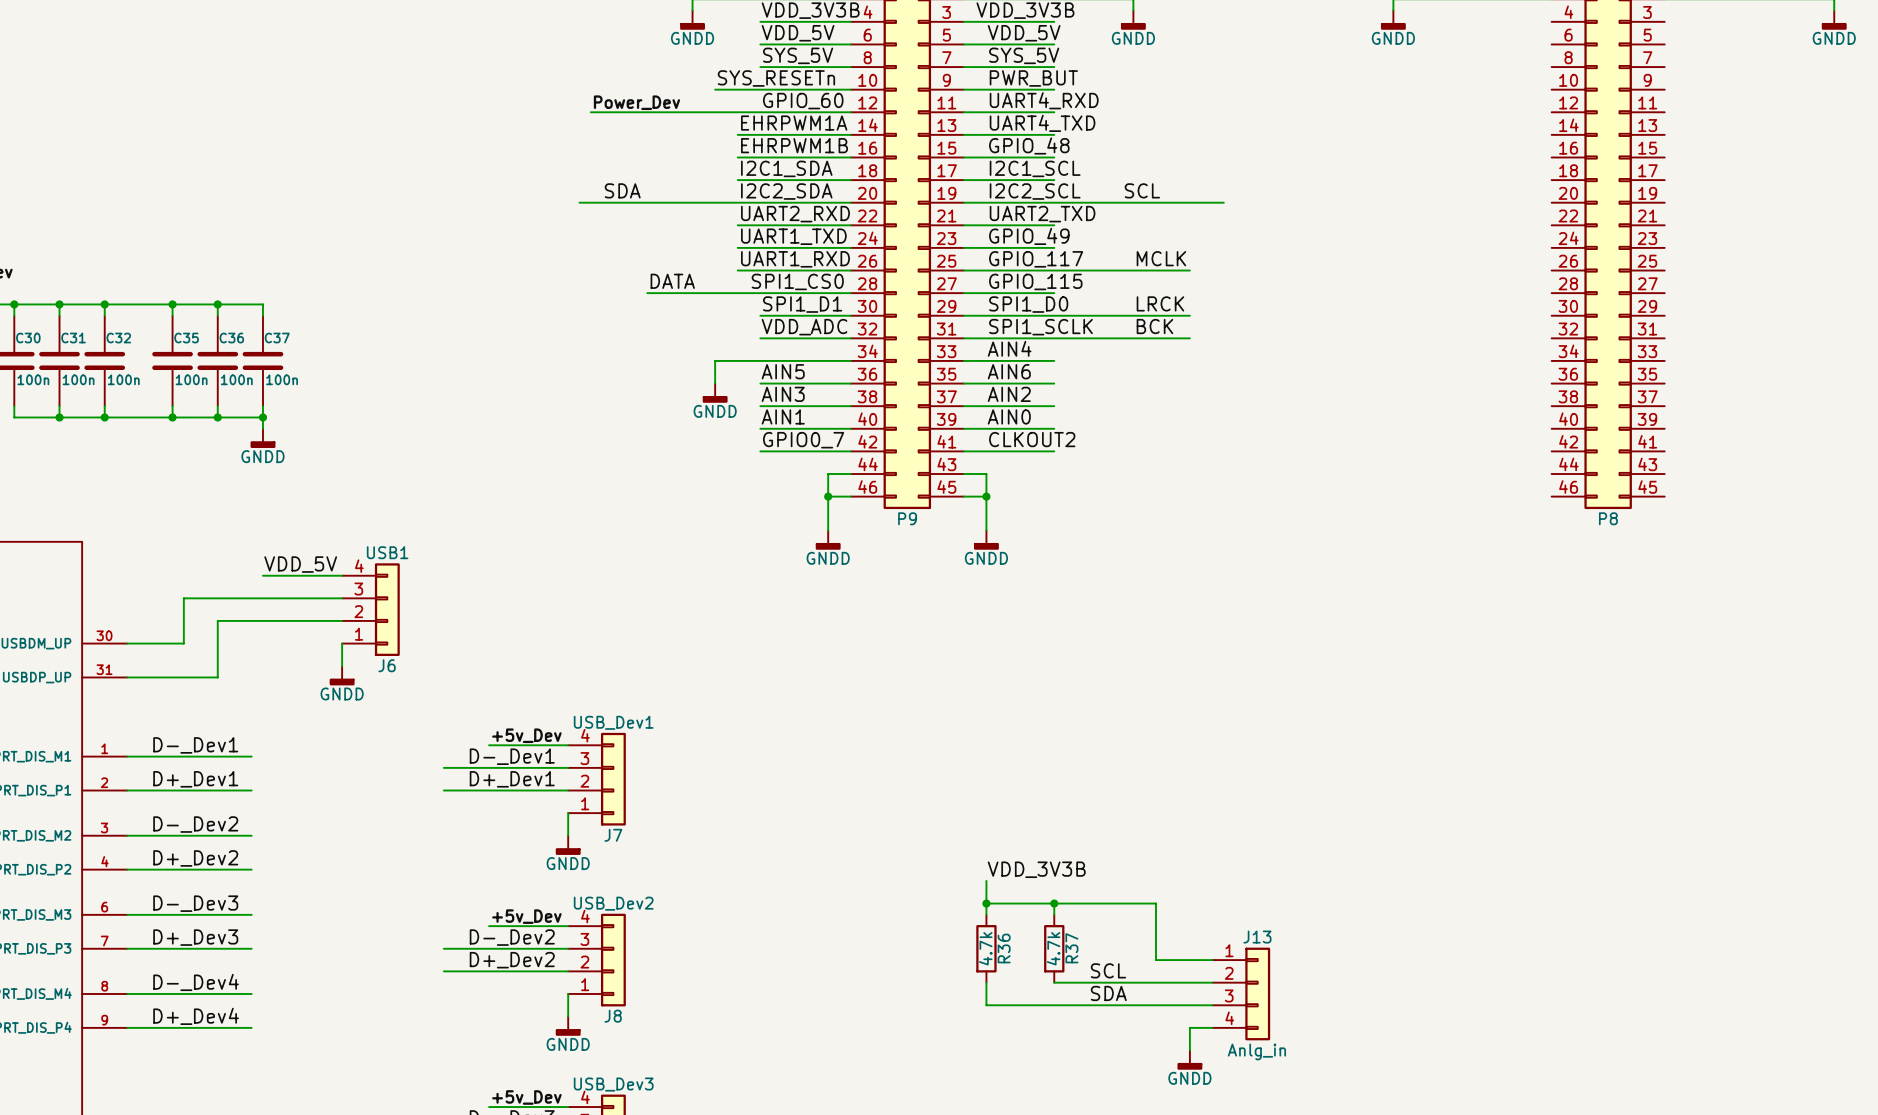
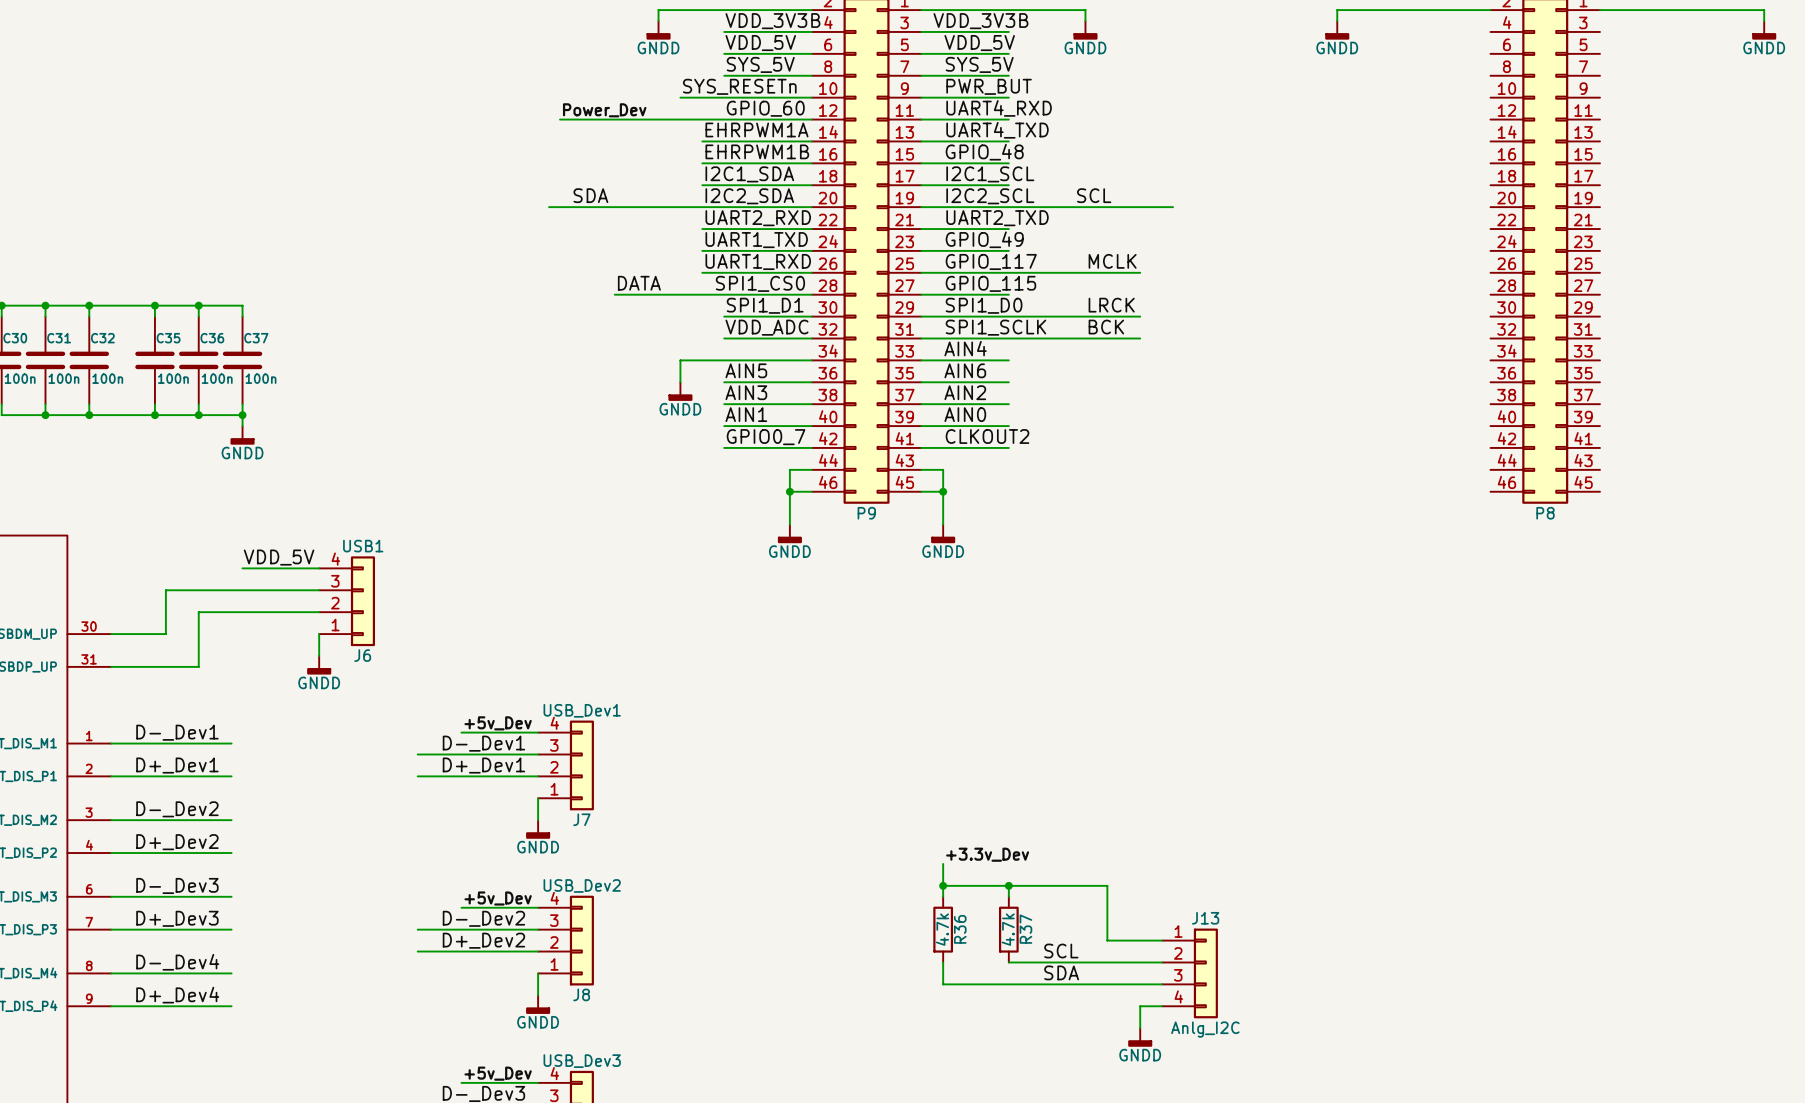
label: VDD_3V3B (1036, 869) -> +3.3v_Dev (987, 854)
J13 value: Anlg_in (1256, 1051) -> Anlg_I2C (1205, 1029)

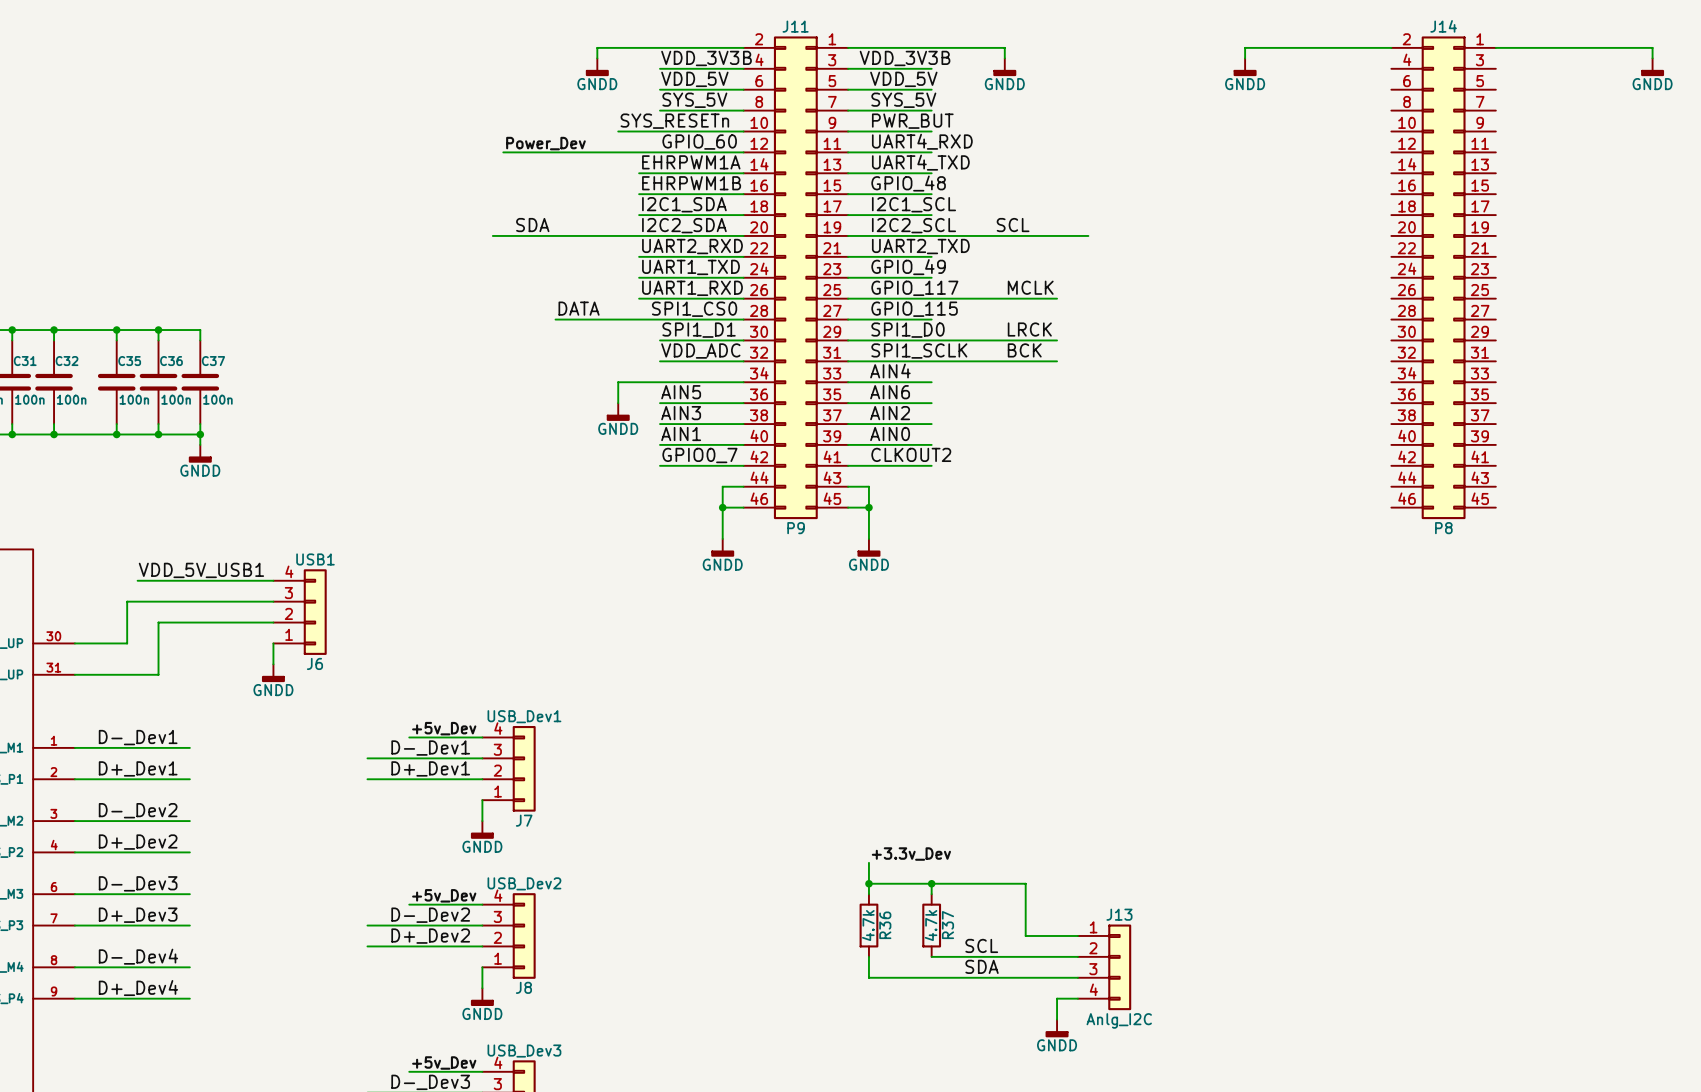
label: VDD_5V (279, 557) -> VDD_5V_USB1 (201, 570)
wire: none -> (137, 580) (200, 580)

